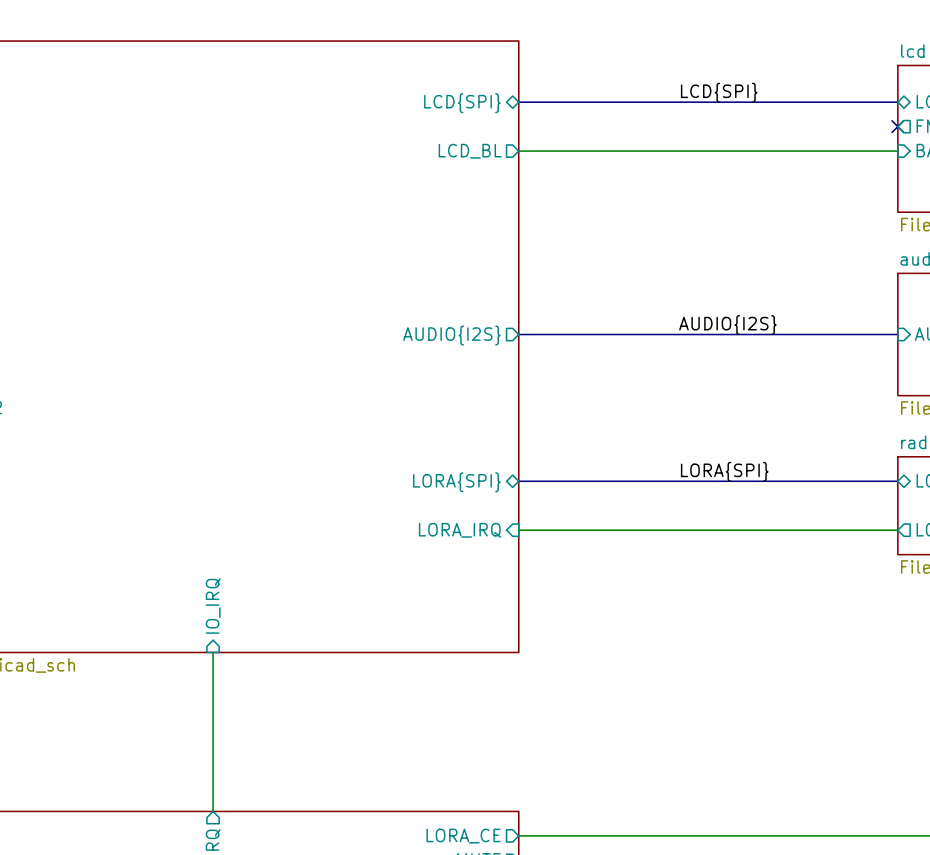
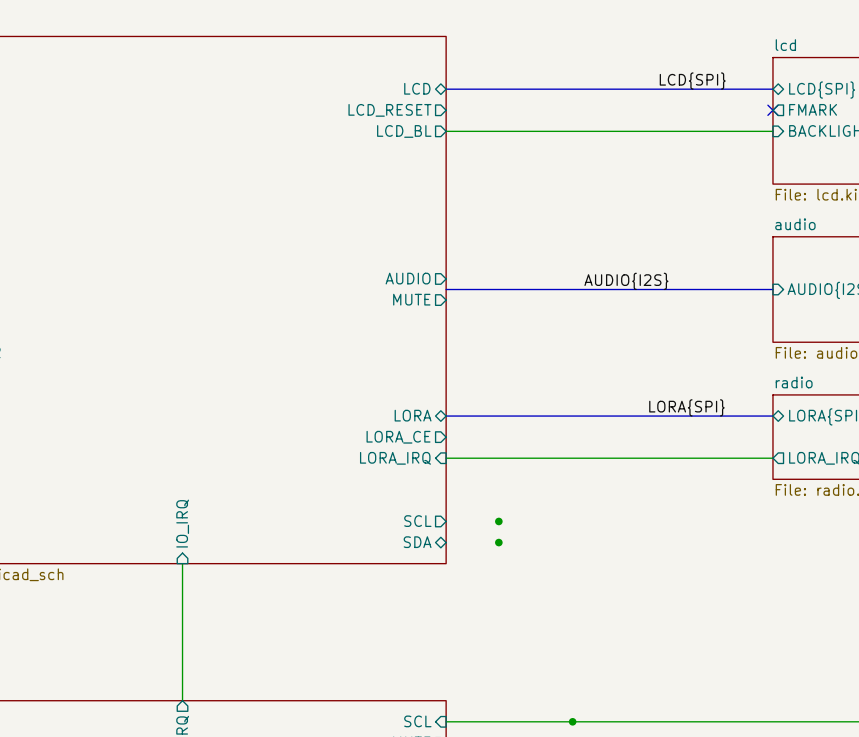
label position: LCD{SPI} (719, 92) -> LCD{SPI} (692, 81)
sheet pin: LCD{SPI} (462, 103) -> LCD (417, 88)
sheet pin: none -> LCD_RESET (389, 110)
sheet pin: AUDIO{I2S} (451, 335) -> AUDIO (408, 278)
sheet pin: none -> MUTE (411, 299)
label position: LORA{SPI} (724, 471) -> LORA{SPI} (686, 407)
sheet pin: LORA{SPI} (456, 482) -> LORA (413, 415)
sheet pin: none -> LORA_CE (398, 437)
sheet pin: none -> SCL (417, 521)
junction: none -> (498, 521)
sheet pin: none -> SDA (417, 542)
junction: none -> (498, 542)
junction: none -> (572, 721)
sheet pin shape: output (463, 836) -> input (417, 721)
sheet pin: LORA_CE (463, 836) -> SCL (417, 721)

